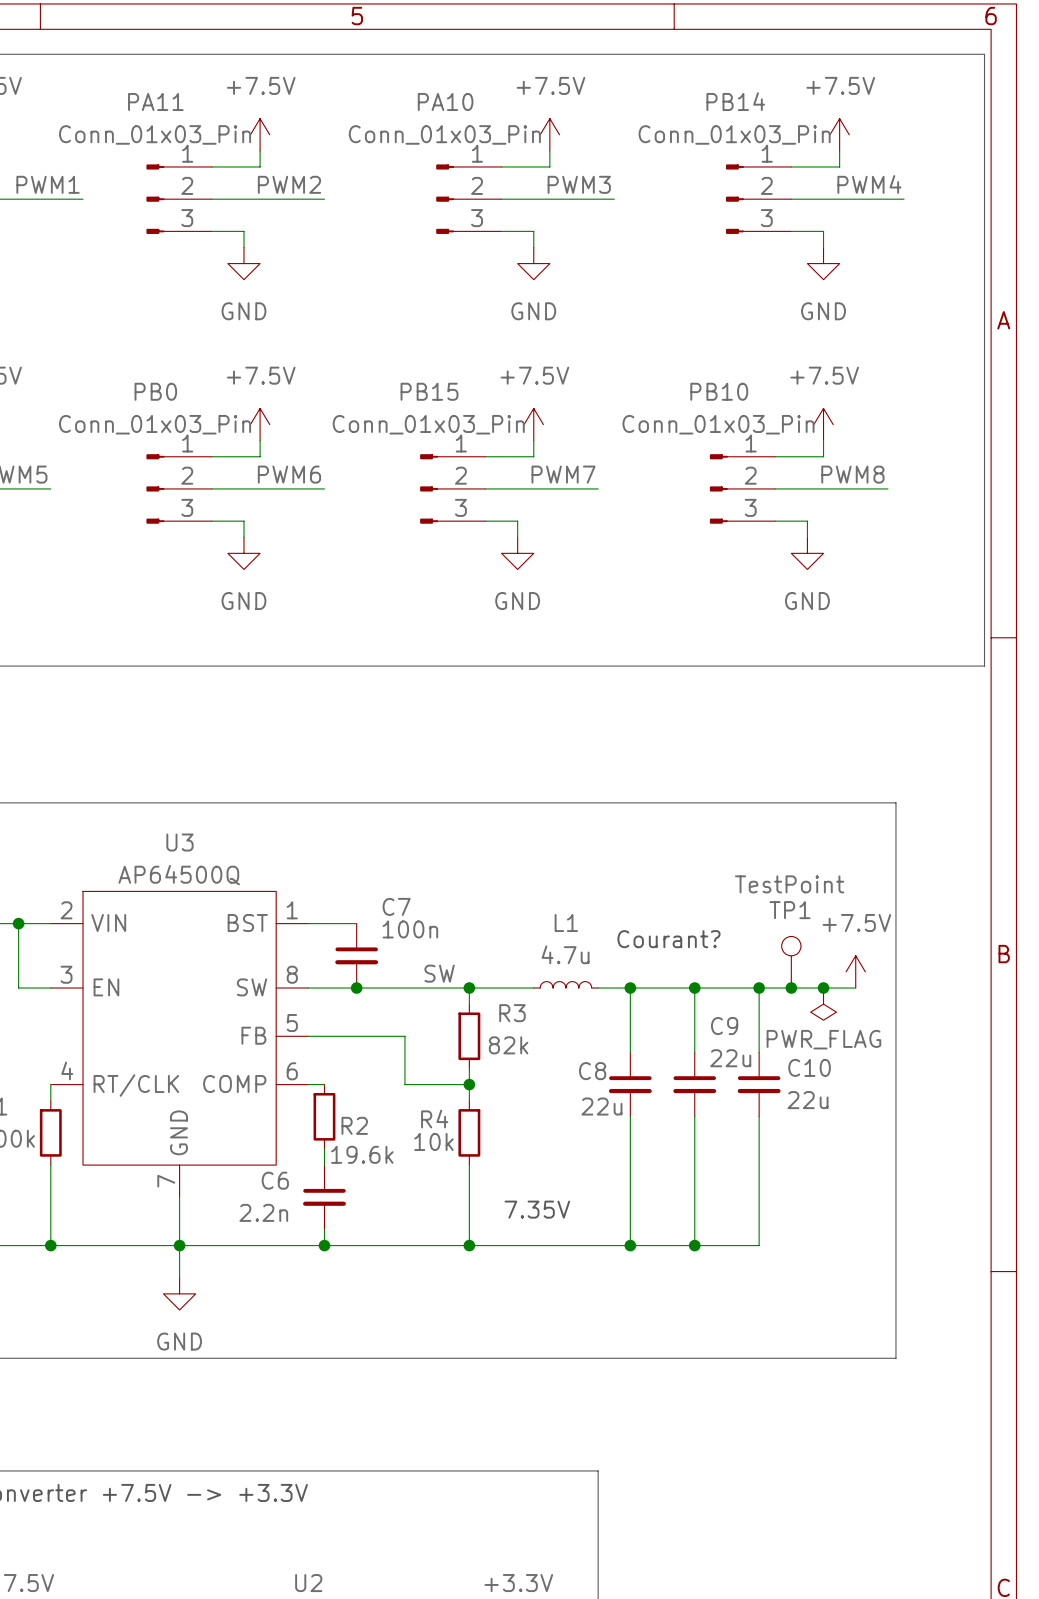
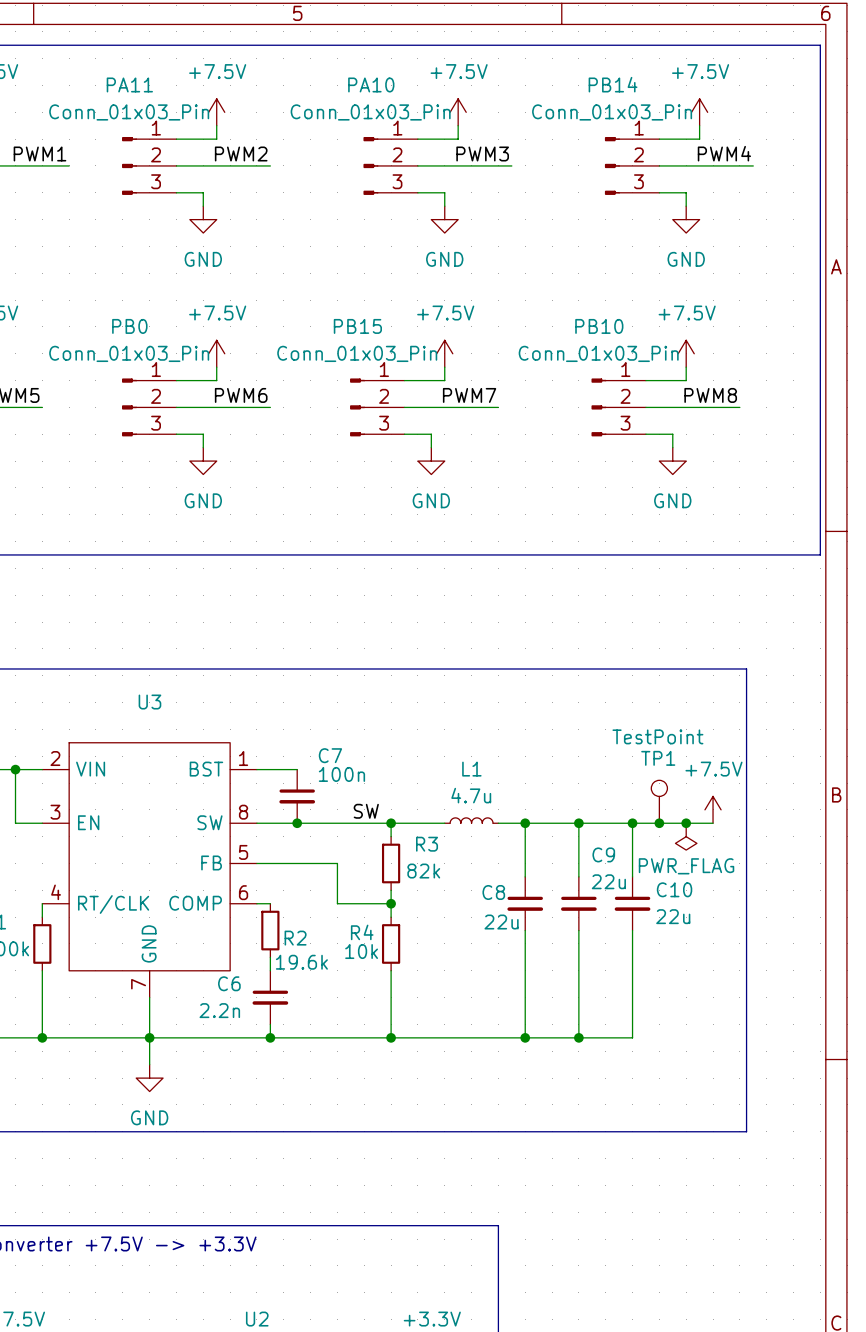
U3 value: AP64500Q (179, 875) -> none
text: Courant? (668, 939) -> none
text: 7.35V (537, 1209) -> none

